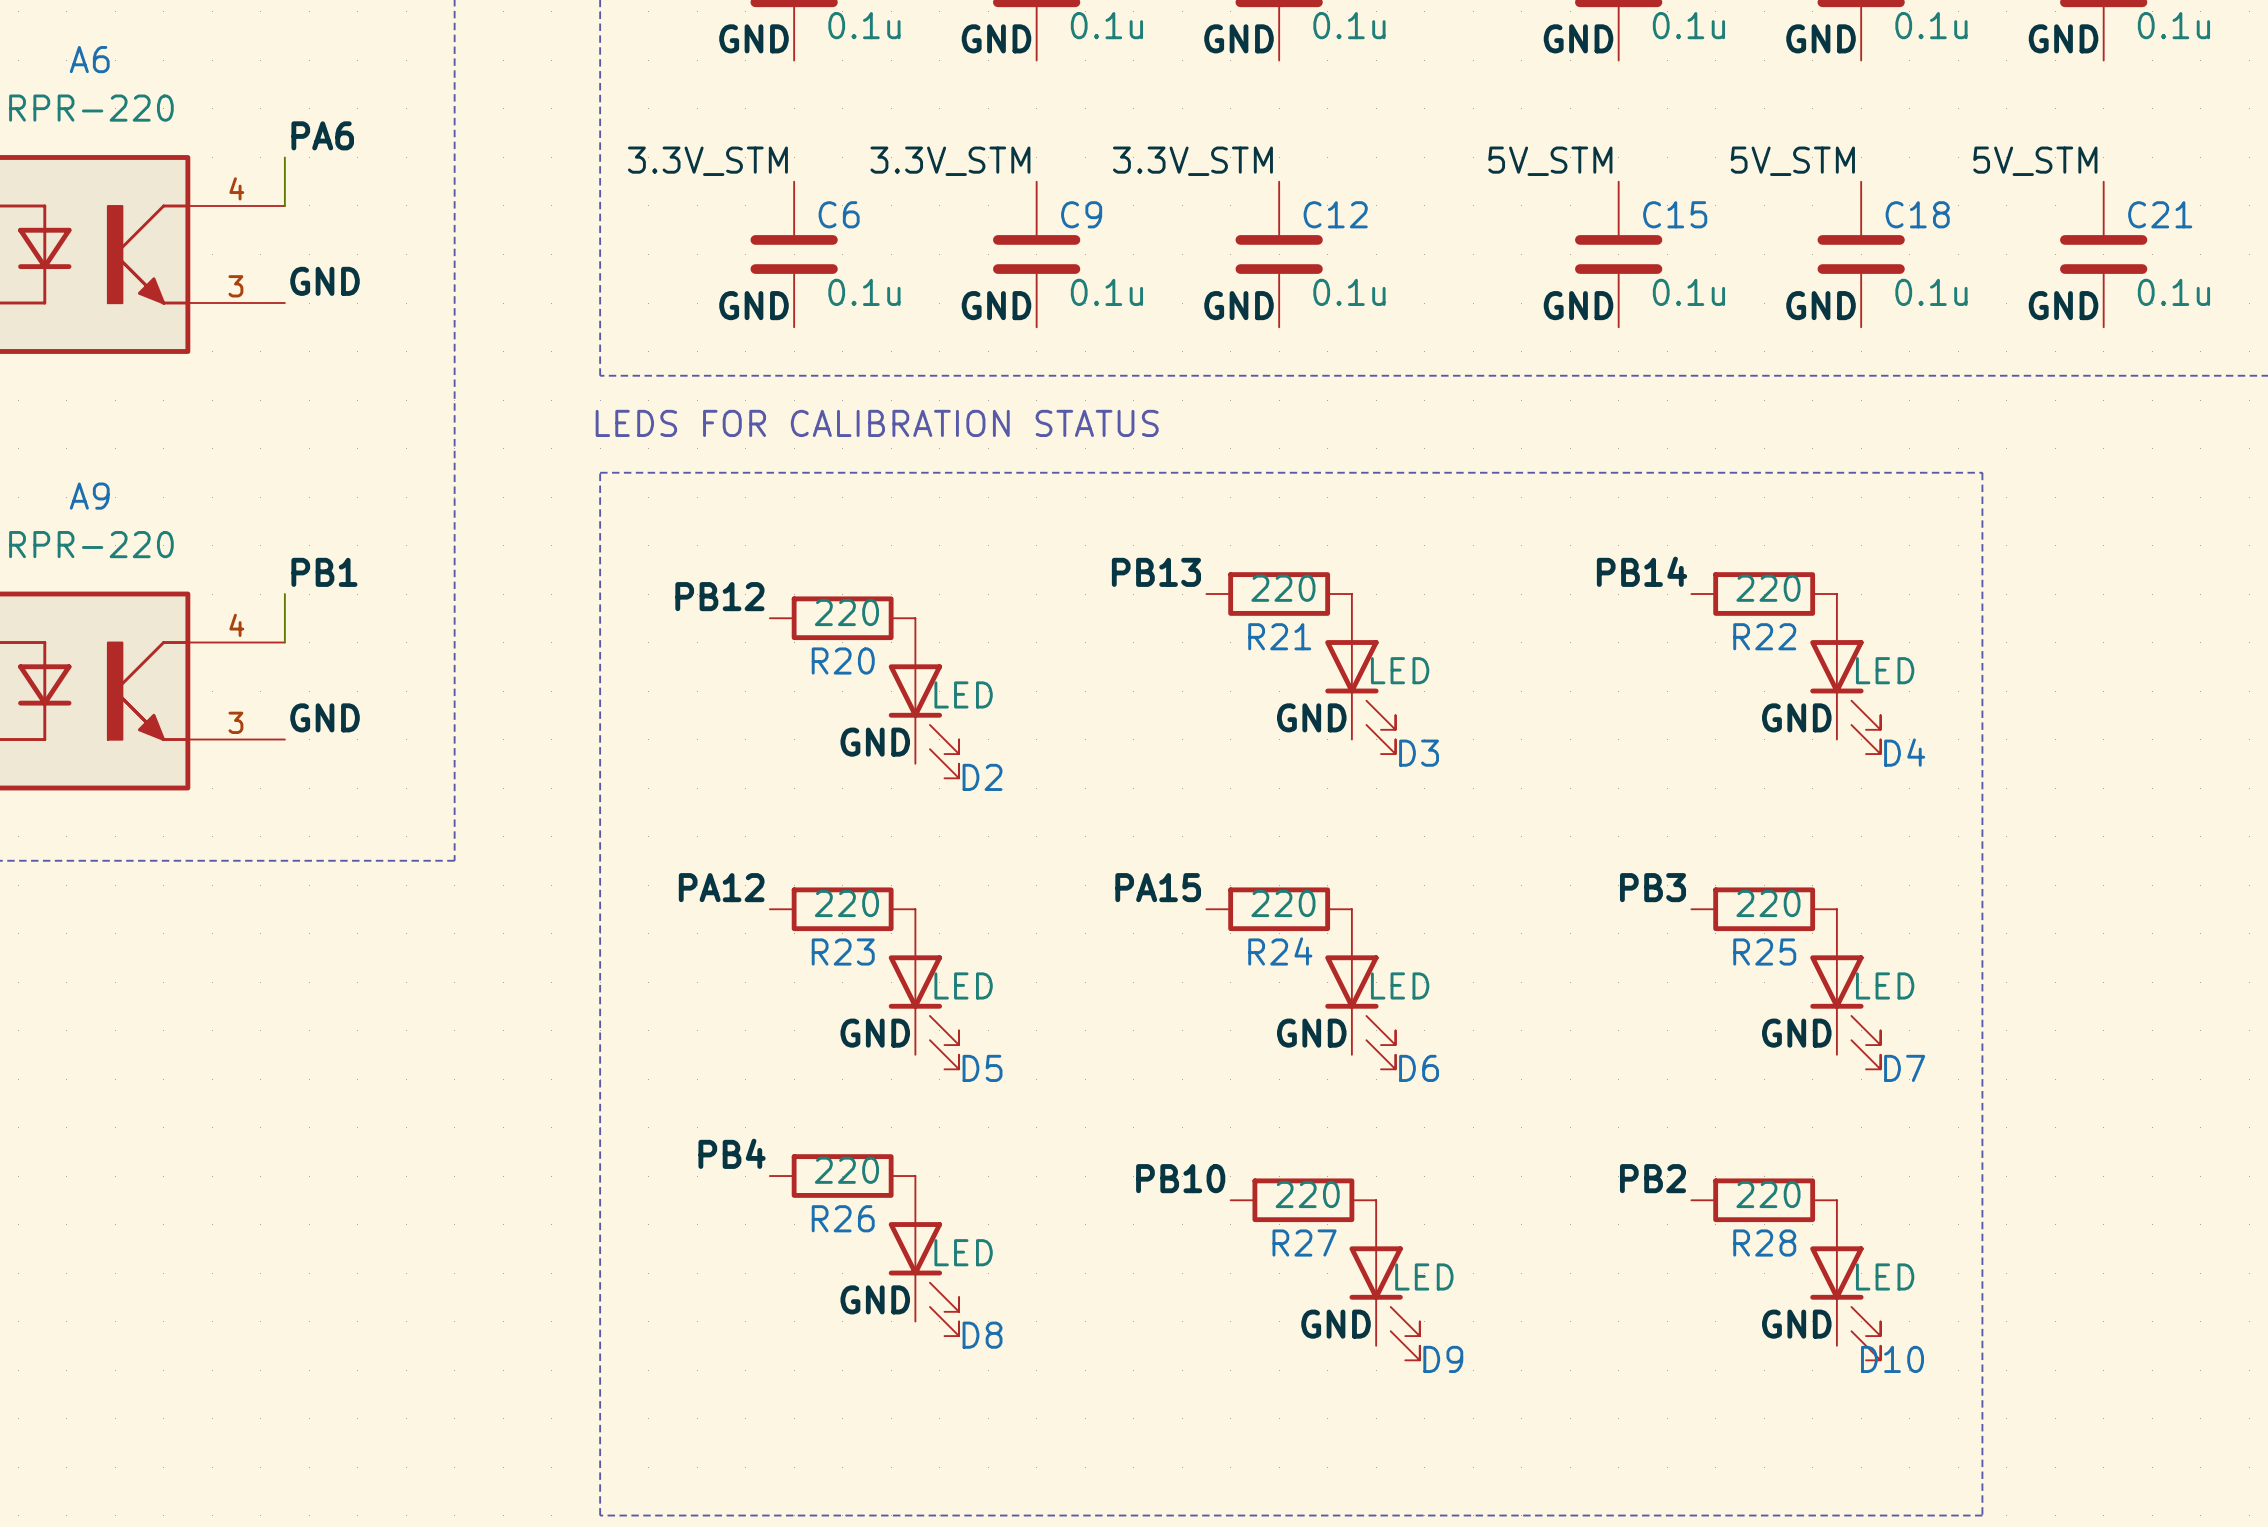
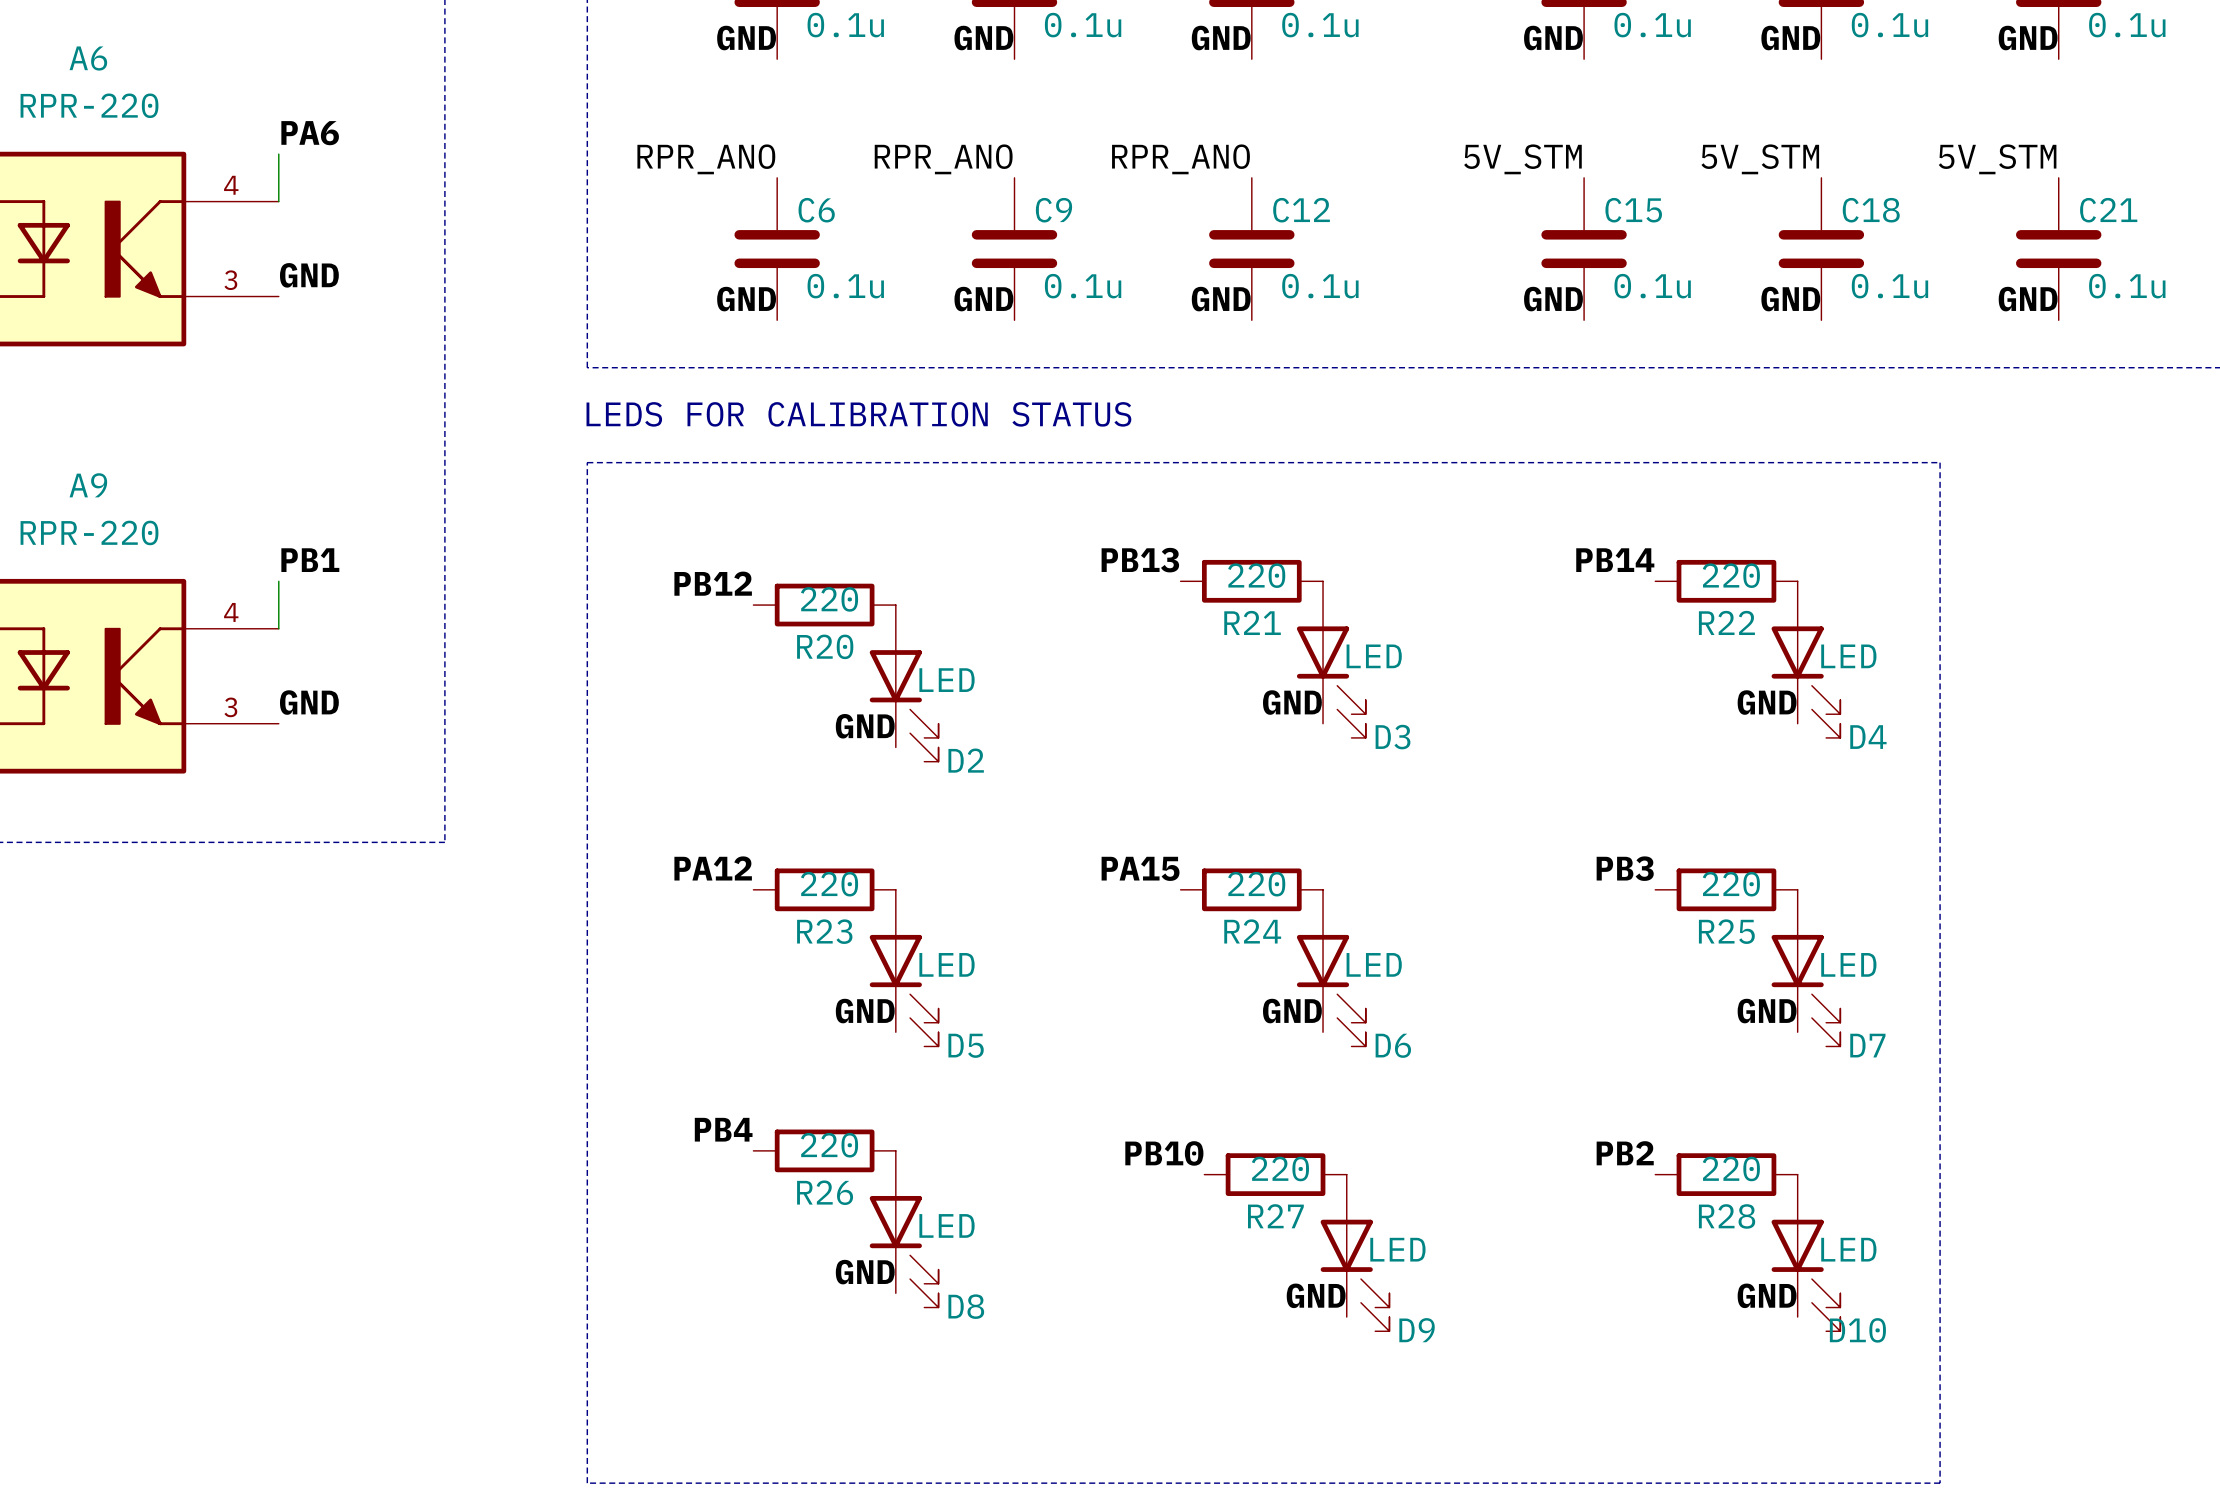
label: 3.3V_STM (707, 161) -> RPR_ANO (706, 159)
label: 3.3V_STM (950, 161) -> RPR_ANO (943, 159)
label: 3.3V_STM (1192, 161) -> RPR_ANO (1180, 159)

